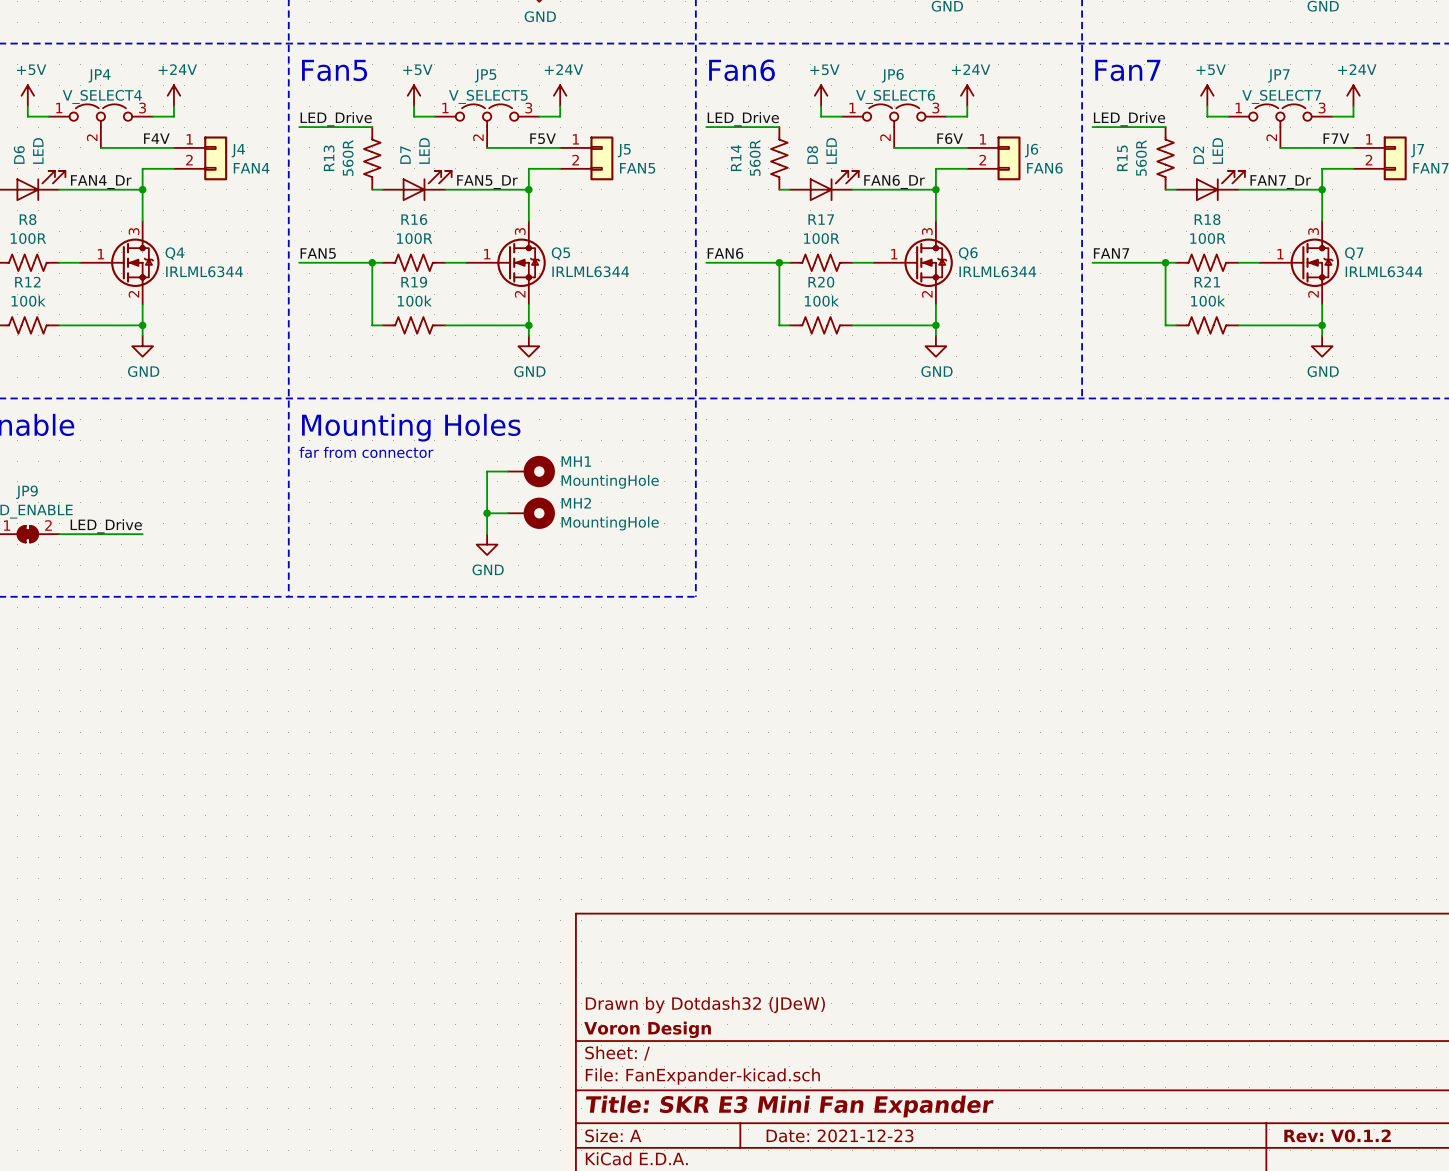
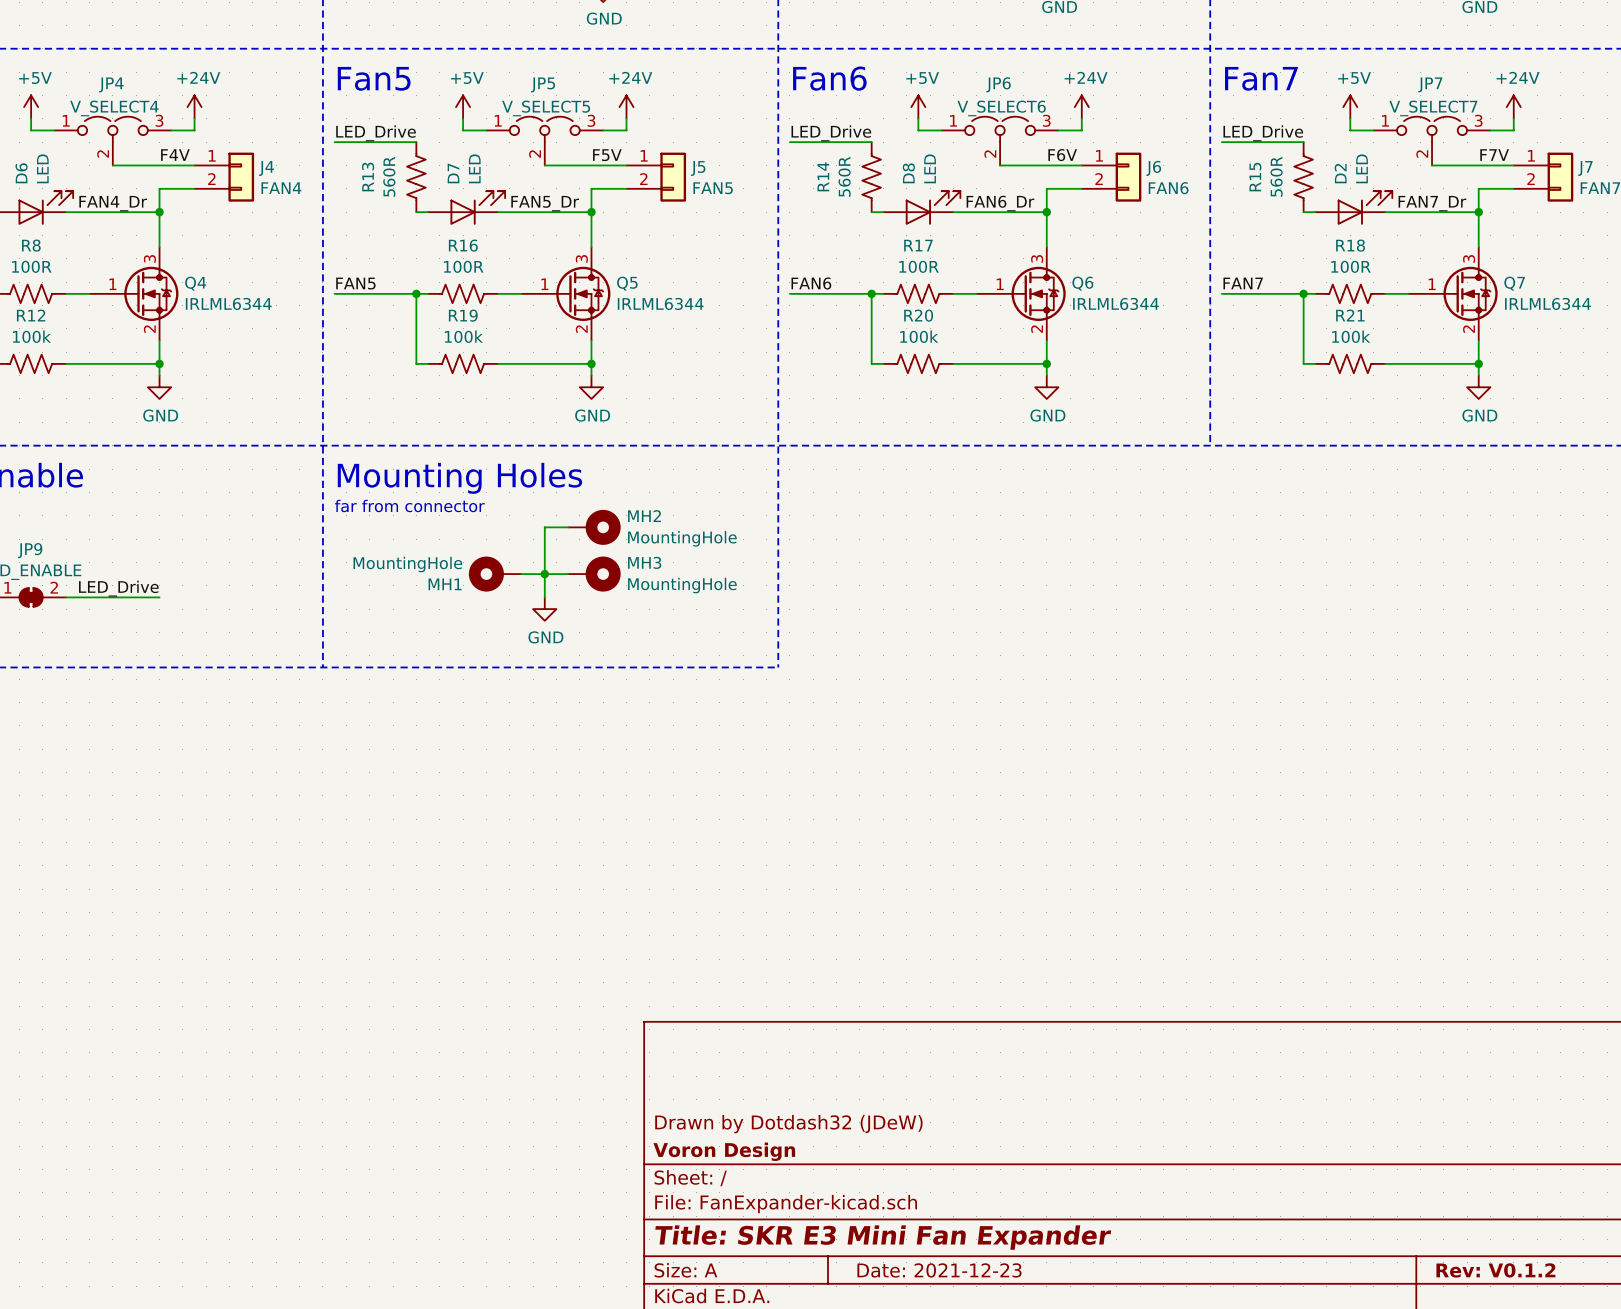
MH1 name: MH1 (576, 461) -> MH2 (644, 516)
MH2 name: MH2 (576, 503) -> MH3 (644, 562)
MH1: none -> MountingHole (495, 574)
wire: none -> (521, 574) (544, 574)

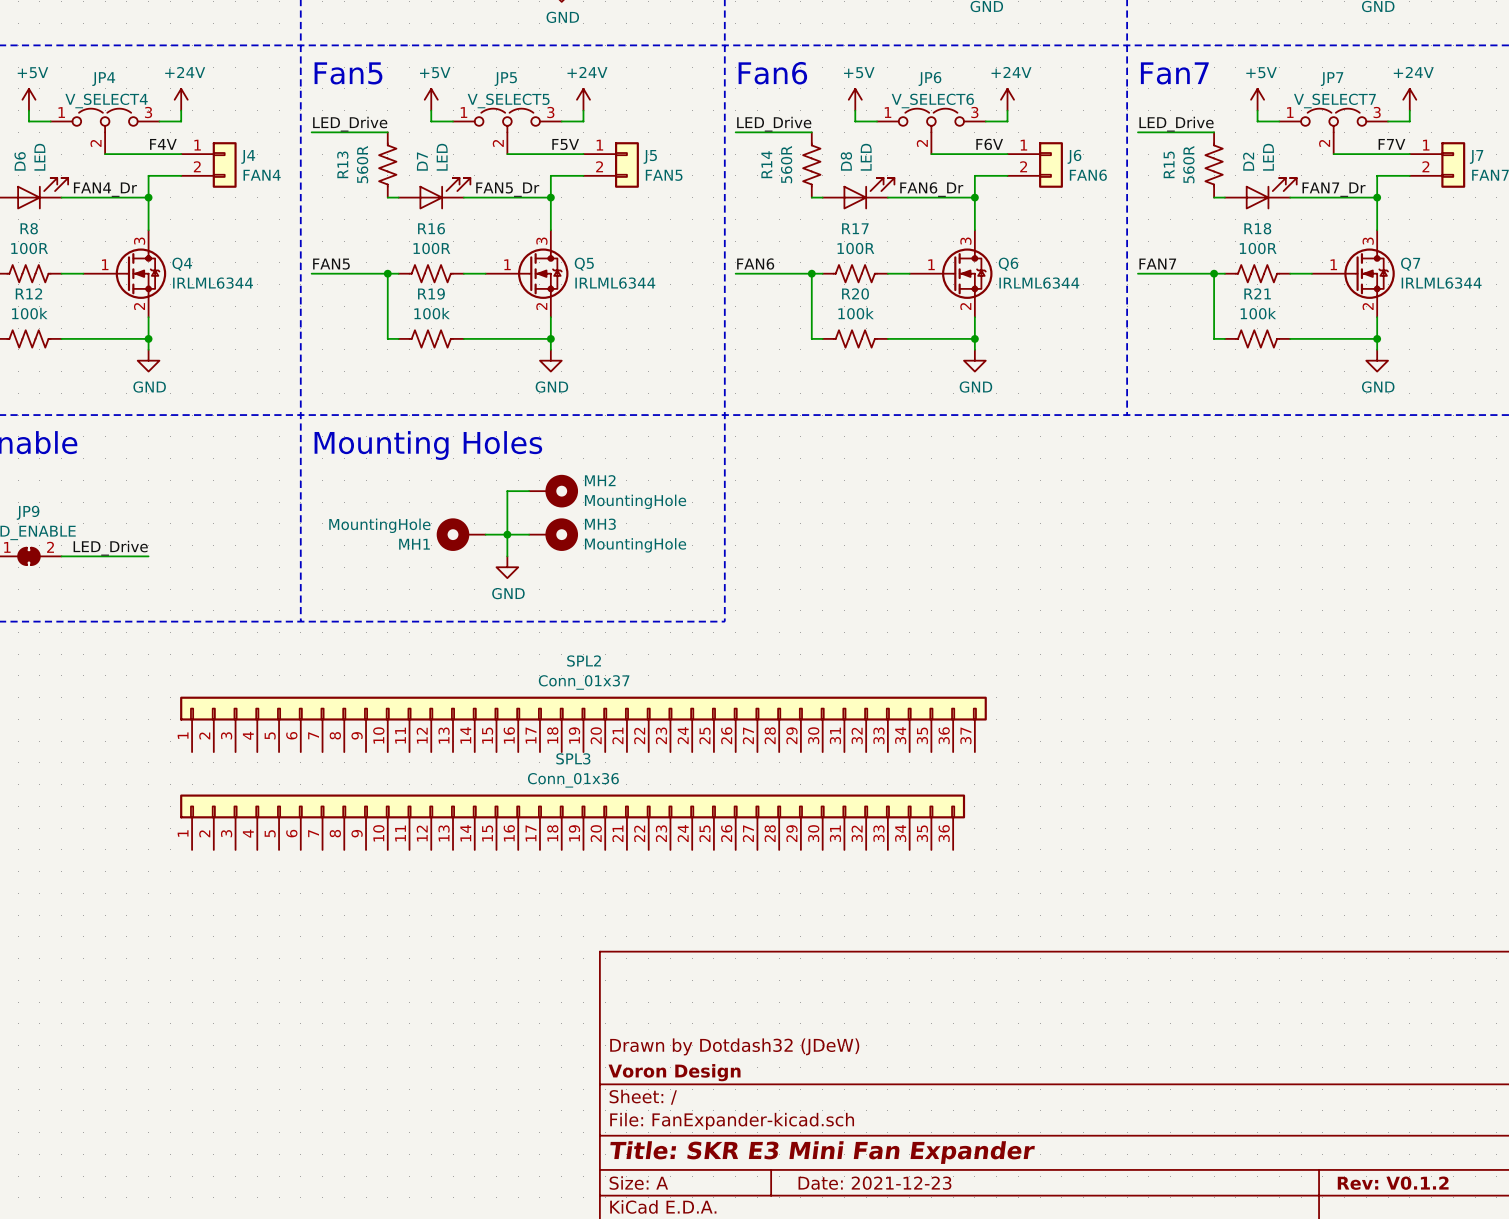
text: far from connector (409, 506) -> none
SPL2: none -> Conn_01x37 (583, 724)
SPL3: none -> Conn_01x36 (572, 822)

